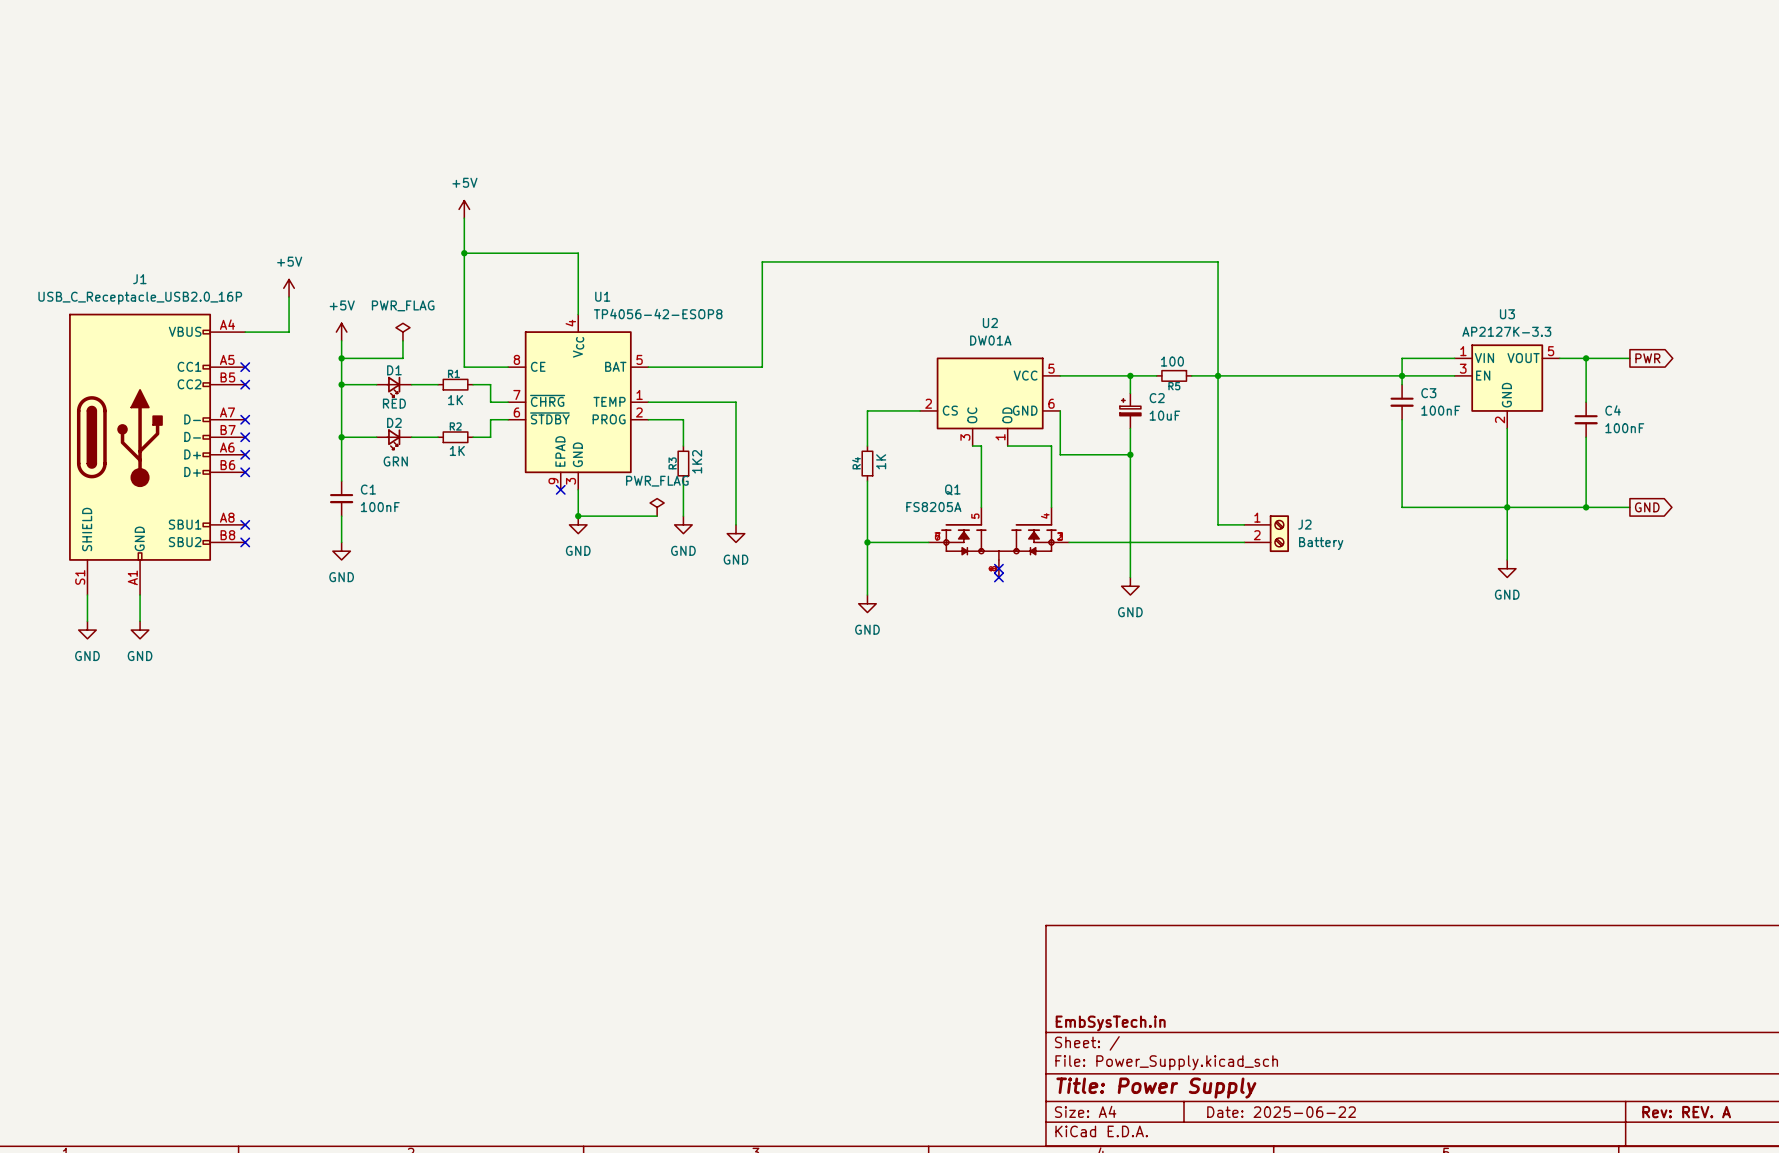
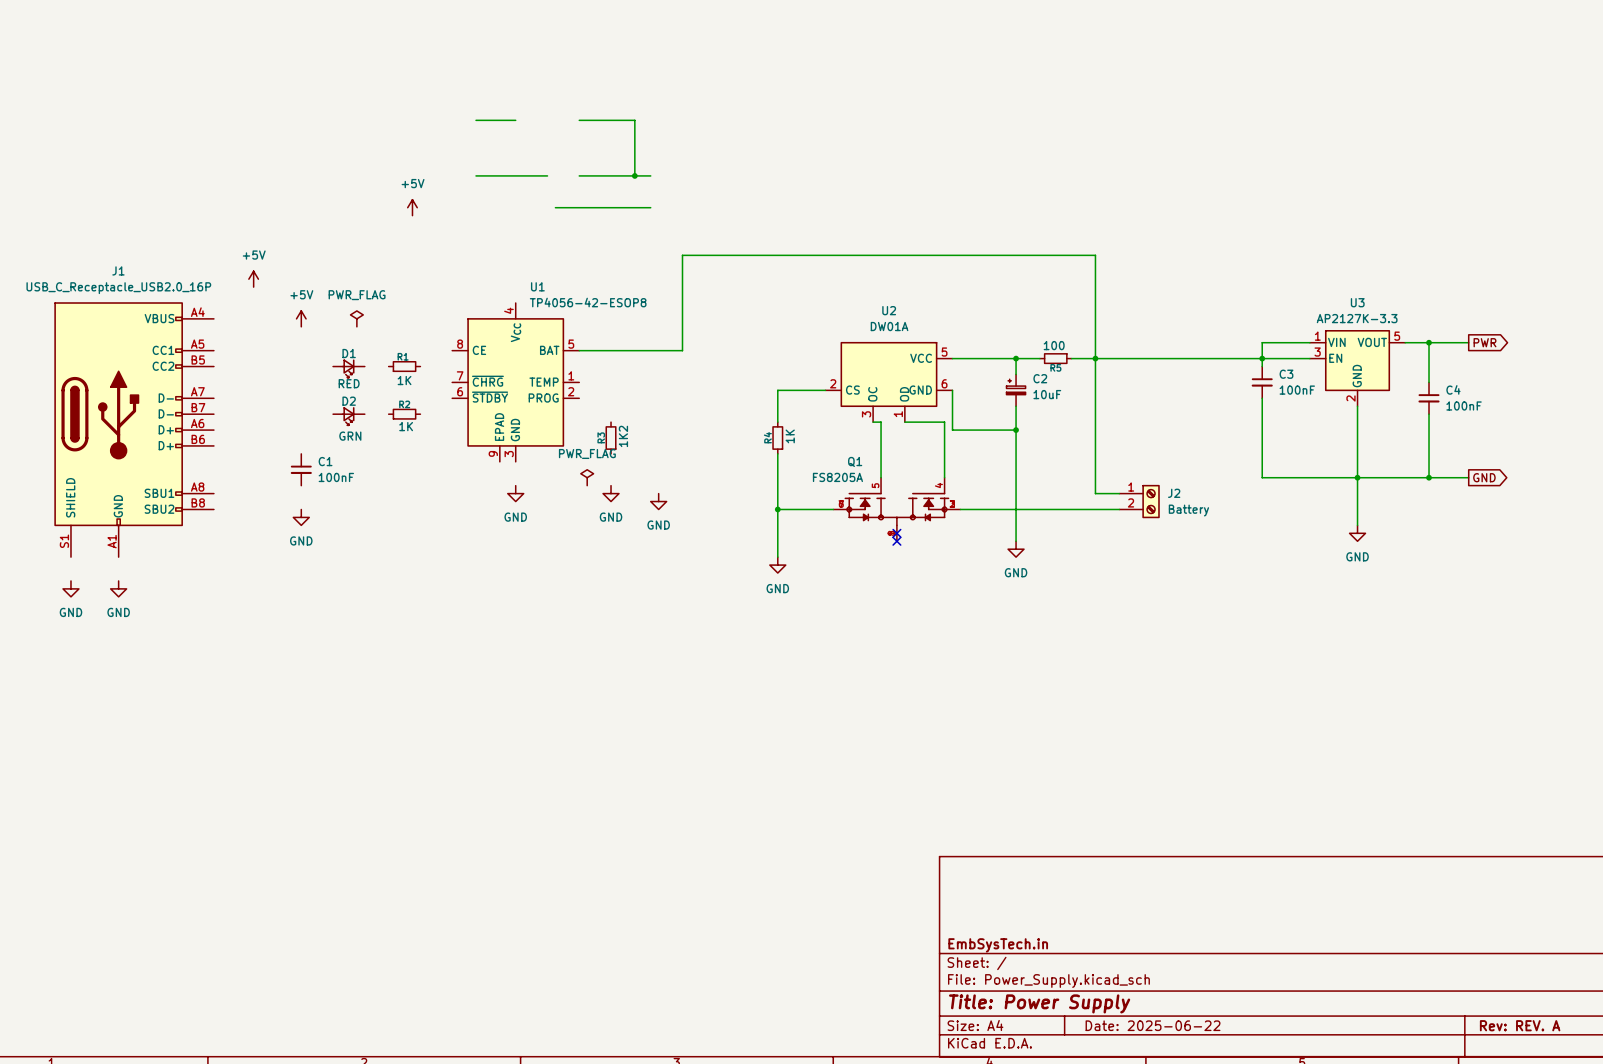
wire: none -> (476, 120) (515, 120)
wire: none -> (579, 120) (634, 120) (634, 175)
wire: none -> (476, 175) (547, 175)
wire: none -> (579, 175) (650, 175)
junction: none -> (634, 175)
wire: none -> (555, 207) (650, 207)
wire: (464, 218) (464, 367) (508, 367) -> none
wire: (464, 253) (578, 253) (578, 314) -> none
junction: (464, 253) -> none
wire: (289, 297) (289, 332) (245, 332) -> none
wire: (341, 340) (341, 481) -> none
wire: (402, 340) (402, 358) (341, 358) -> none
junction: (341, 358) -> none
no-connect mark: (245, 367) -> none
no-connect mark: (245, 384) -> none
wire: (341, 384) (376, 384) -> none
junction: (341, 384) -> none
wire: (411, 384) (438, 384) -> none
wire: (473, 384) (490, 384) (490, 402) (508, 402) -> none
wire: (648, 402) (736, 402) (736, 524) -> none
no-connect mark: (245, 419) -> none
wire: (508, 419) (490, 419) (490, 437) (473, 437) -> none
wire: (648, 419) (683, 419) (683, 446) -> none
no-connect mark: (245, 437) -> none
wire: (341, 437) (376, 437) -> none
junction: (341, 437) -> none
wire: (411, 437) (438, 437) -> none
no-connect mark: (245, 454) -> none
no-connect mark: (245, 472) -> none
wire: (683, 481) (683, 516) -> none
no-connect mark: (560, 489) -> none
wire: (578, 489) (578, 516) (657, 516) -> none
wire: (341, 516) (341, 542) -> none
junction: (578, 516) -> none
no-connect mark: (245, 524) -> none
no-connect mark: (245, 542) -> none
wire: (87, 595) (87, 621) -> none
wire: (140, 595) (140, 621) -> none

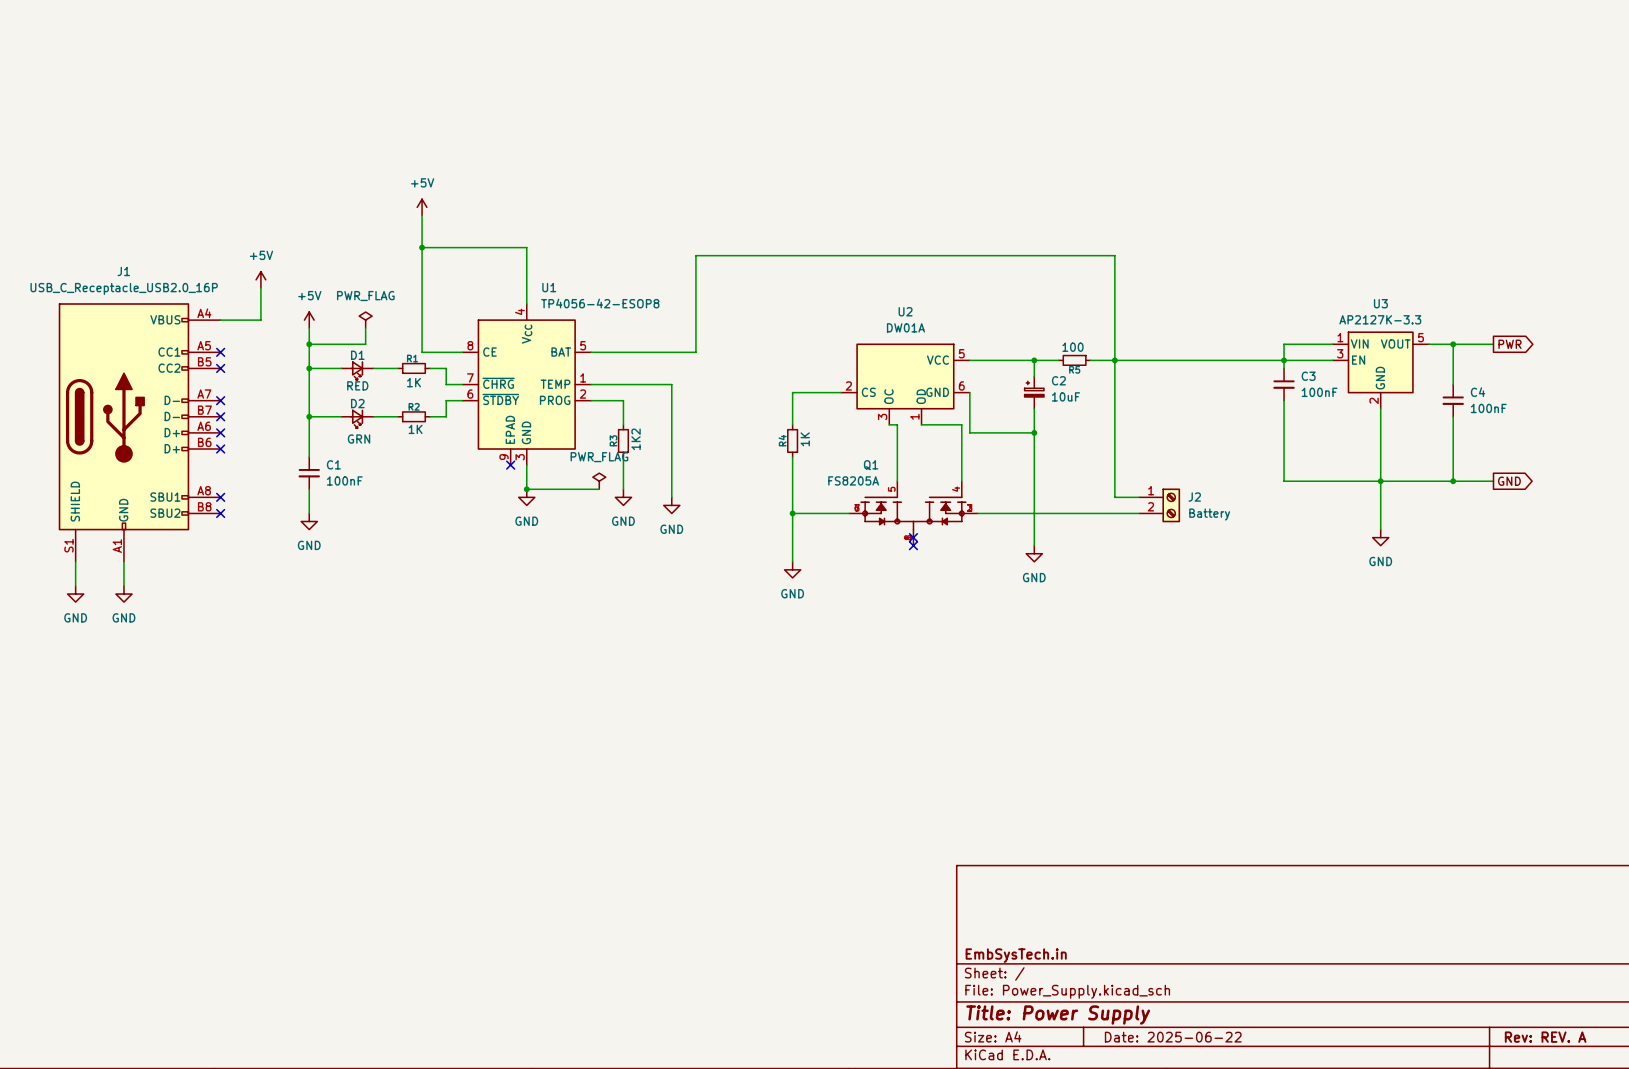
wire: (476, 120) (515, 120) -> none
wire: (579, 120) (634, 120) (634, 175) -> none
wire: (476, 175) (547, 175) -> none
wire: (579, 175) (650, 175) -> none
junction: (634, 175) -> none
wire: (555, 207) (650, 207) -> none
wire: none -> (422, 215) (422, 352) (462, 352)
wire: none -> (422, 247) (526, 247) (526, 304)
junction: none -> (422, 247)
wire: none -> (260, 287) (260, 320) (220, 320)
wire: none -> (309, 328) (309, 457)
wire: none -> (365, 328) (365, 344) (309, 344)
junction: none -> (309, 344)
no-connect mark: none -> (220, 352)
no-connect mark: none -> (220, 368)
wire: none -> (309, 368) (341, 368)
junction: none -> (309, 368)
wire: none -> (373, 368) (397, 368)
wire: none -> (430, 368) (446, 368) (446, 384) (462, 384)
wire: none -> (591, 384) (671, 384) (671, 497)
no-connect mark: none -> (220, 400)
wire: none -> (462, 400) (446, 400) (446, 416) (430, 416)
wire: none -> (591, 400) (623, 400) (623, 424)
no-connect mark: none -> (220, 416)
wire: none -> (309, 416) (341, 416)
junction: none -> (309, 416)
wire: none -> (373, 416) (397, 416)
no-connect mark: none -> (220, 432)
no-connect mark: none -> (220, 449)
wire: none -> (623, 457) (623, 489)
no-connect mark: none -> (510, 465)
wire: none -> (526, 465) (526, 489) (599, 489)
wire: none -> (309, 489) (309, 513)
junction: none -> (526, 489)
no-connect mark: none -> (220, 497)
no-connect mark: none -> (220, 513)
wire: none -> (75, 561) (75, 585)
wire: none -> (123, 561) (123, 585)

